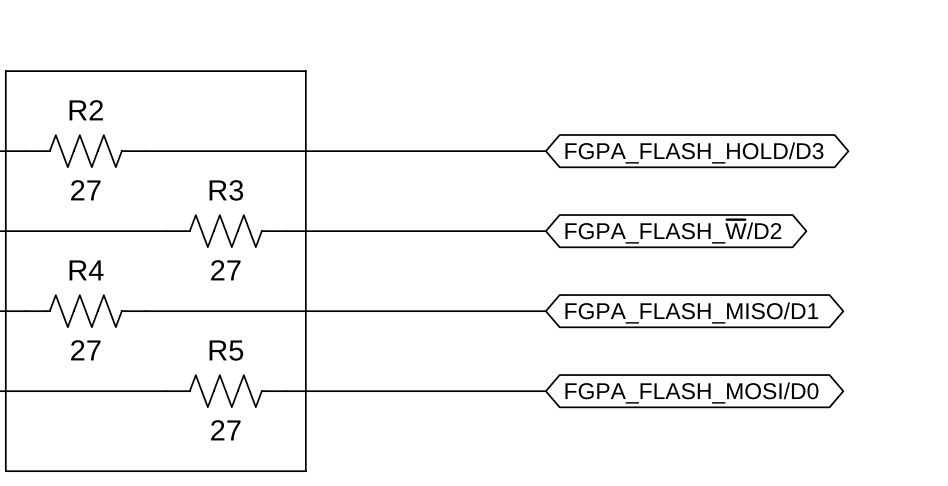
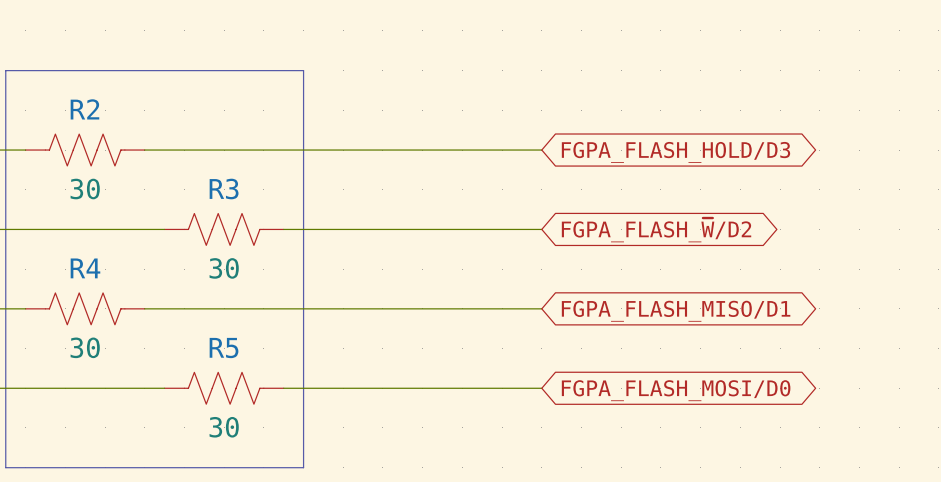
R2 value: 27 (85, 190) -> 30 (85, 189)
R3 value: 27 (225, 270) -> 30 (224, 268)
R4 value: 27 (85, 350) -> 30 (85, 347)
R5 value: 27 (225, 430) -> 30 (224, 427)

